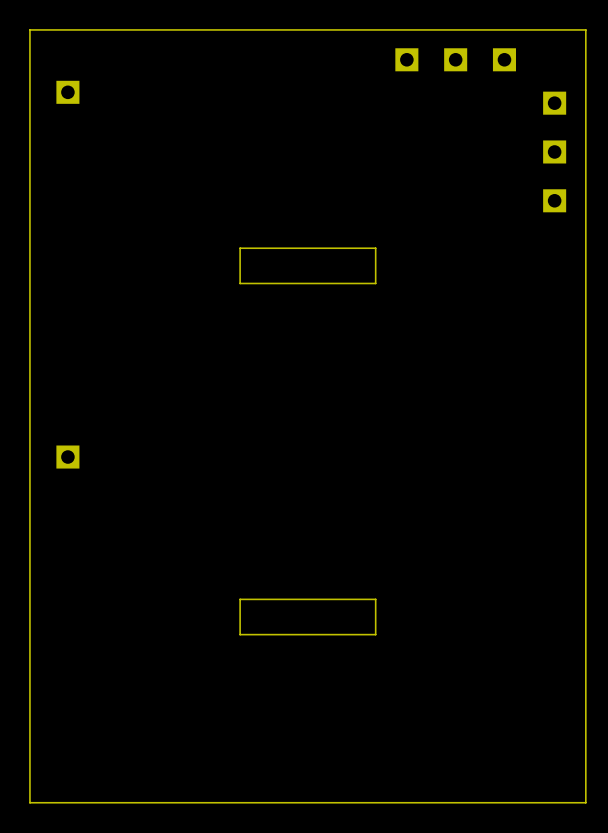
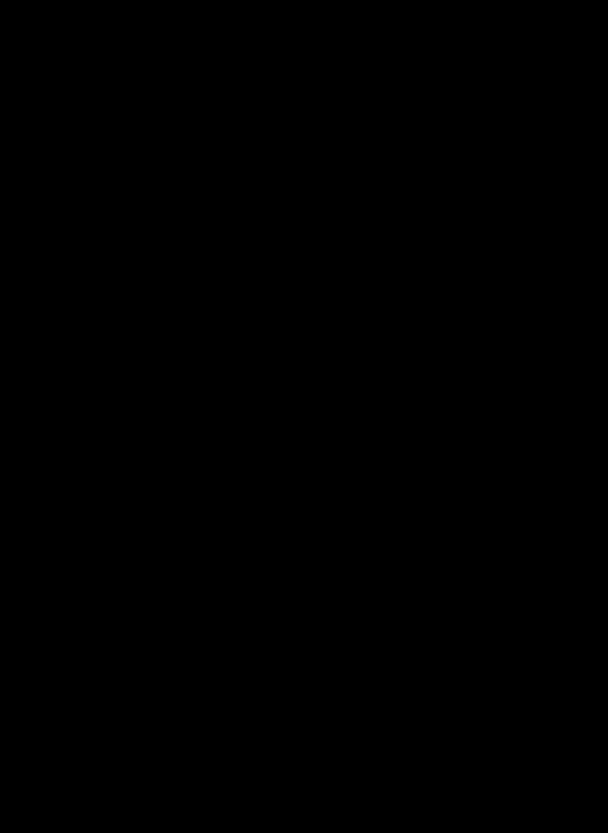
board edge: (29, 29) (585, 29) (585, 802) (29, 802) (29, 29) -> none
part: (406, 59) -> none
part: (455, 59) -> none
part: (504, 59) -> none
part: (67, 92) -> none
part: (554, 103) -> none
part: (554, 151) -> none
part: (554, 200) -> none
board edge: (240, 248) (240, 283) (375, 283) (375, 248) (240, 248) -> none
part: (67, 457) -> none
board edge: (240, 599) (375, 599) (375, 634) (240, 634) (240, 599) -> none

